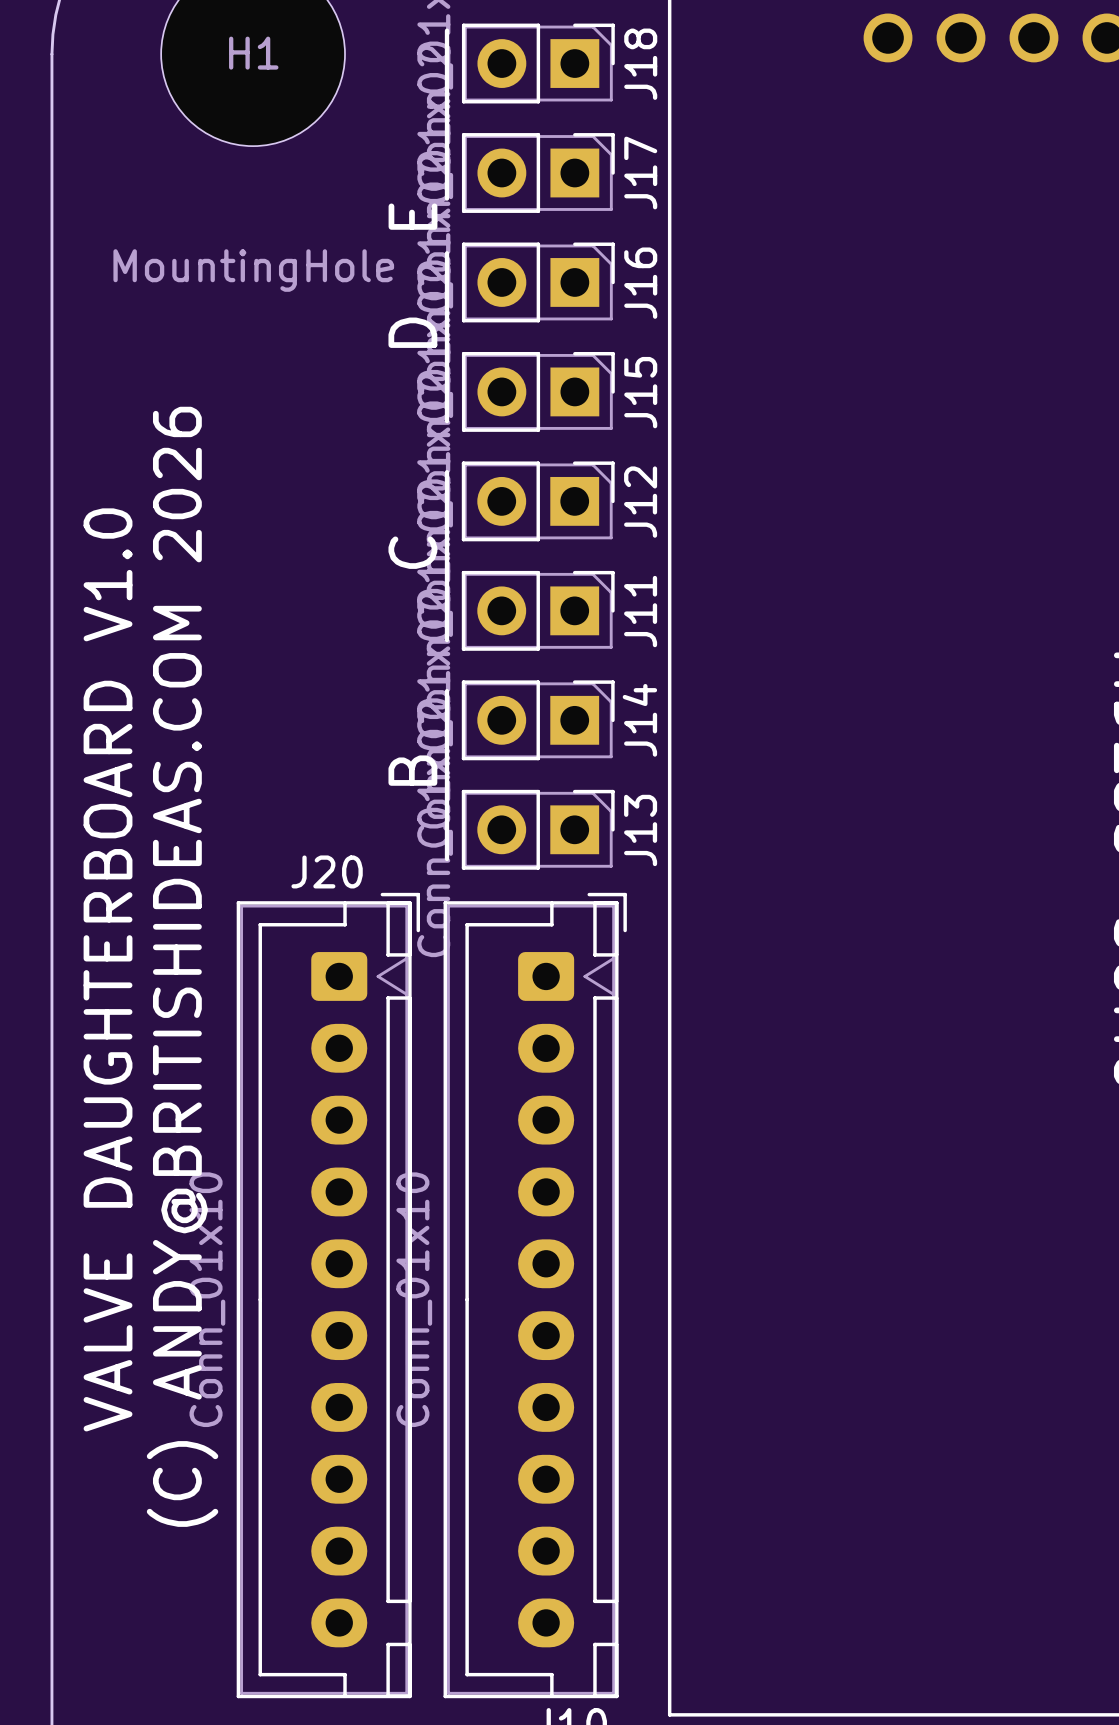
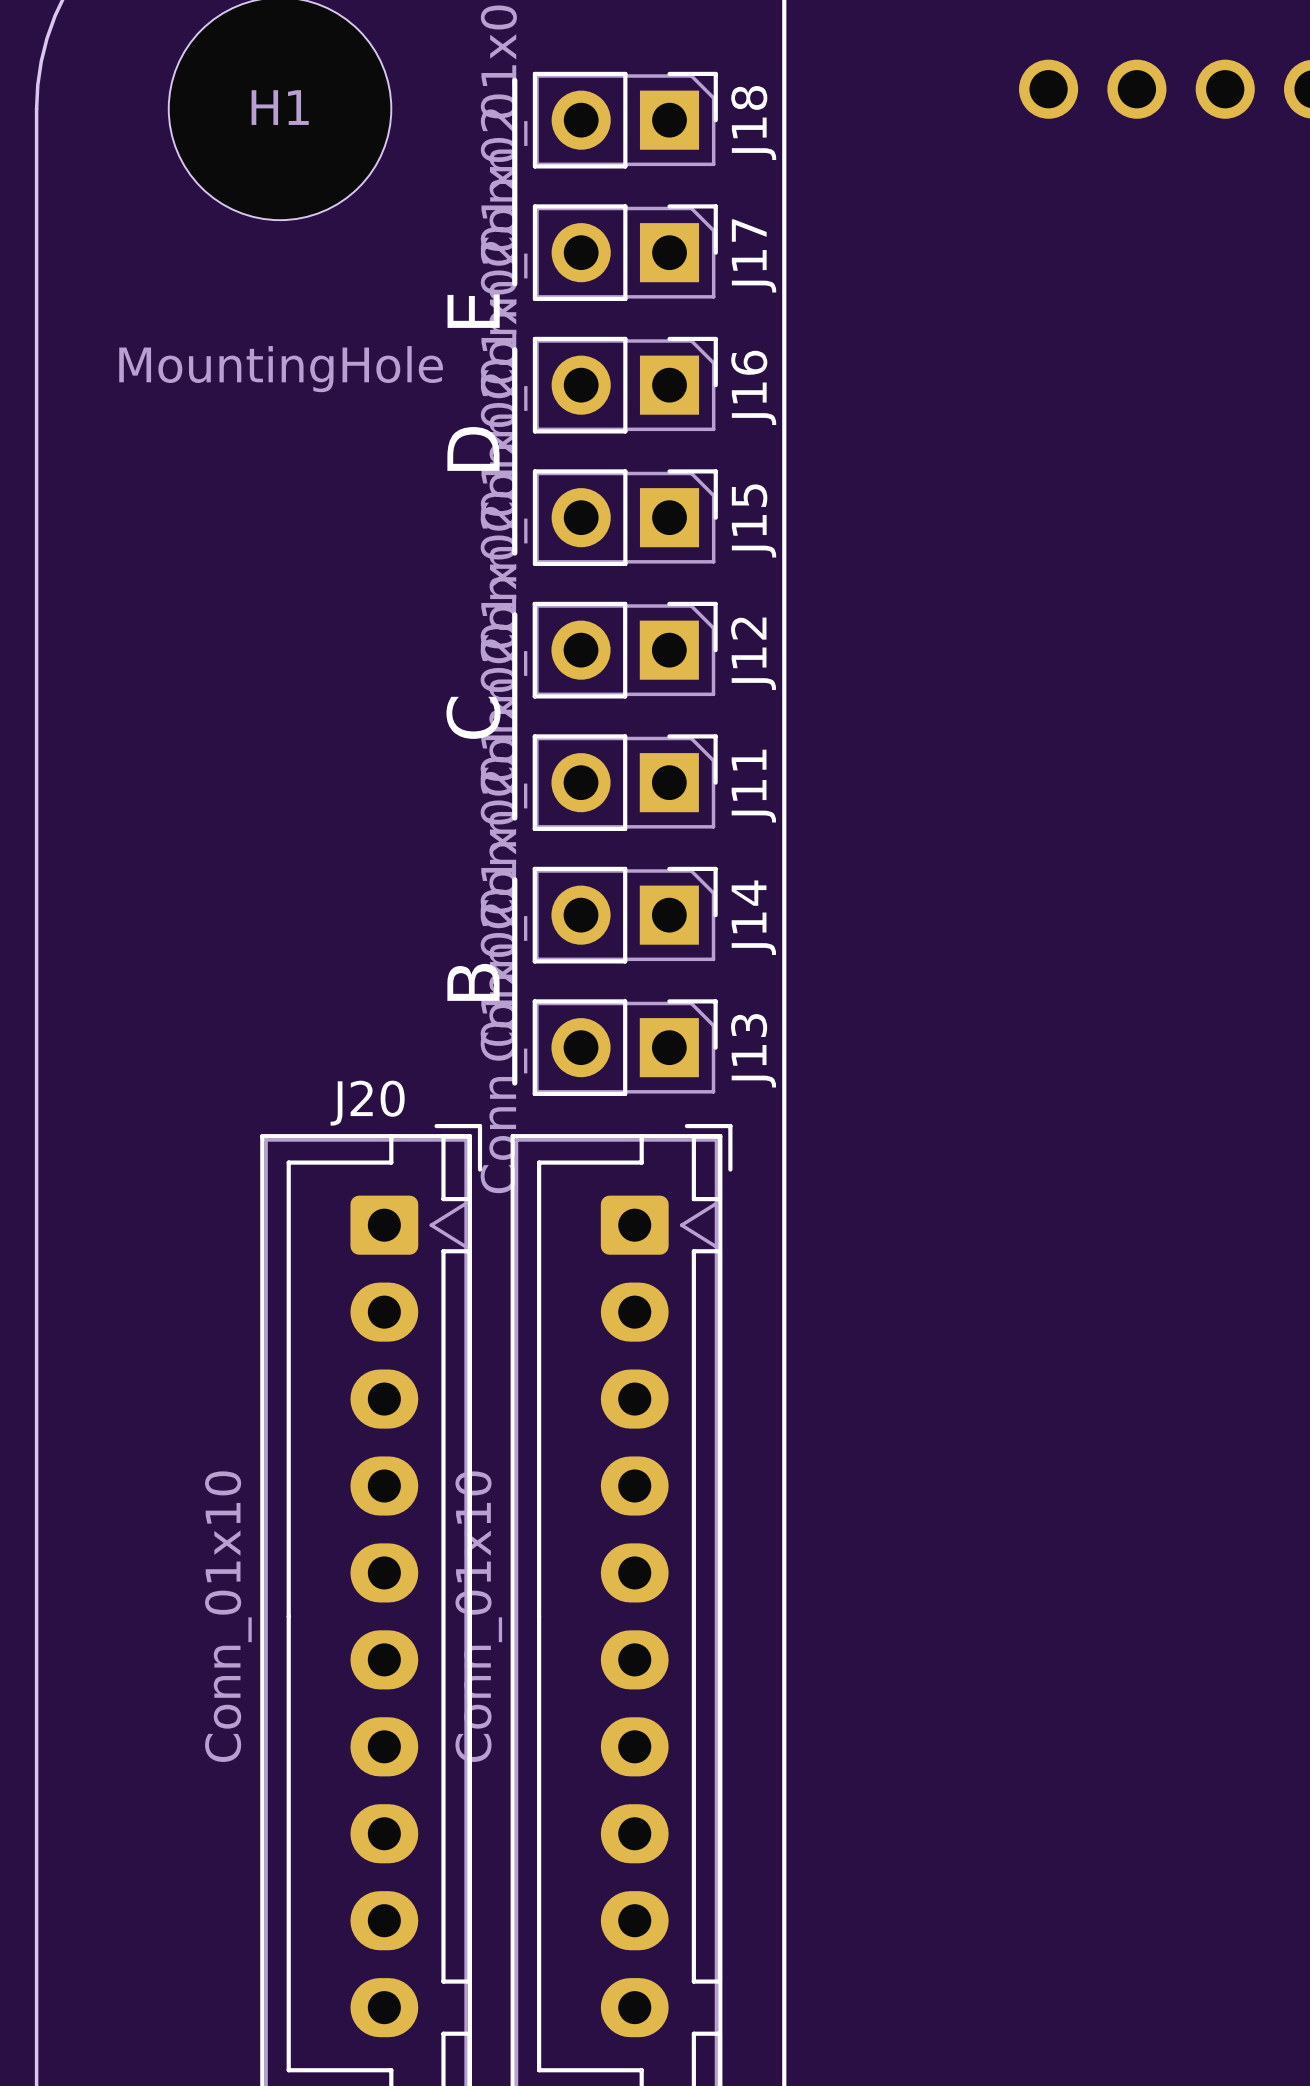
text: (C) ANDY@BRITISHIDEAS.COM 2026 (182, 966) -> none
text: VALVE DAUGHTERBOARD V1.0 (108, 969) -> none

